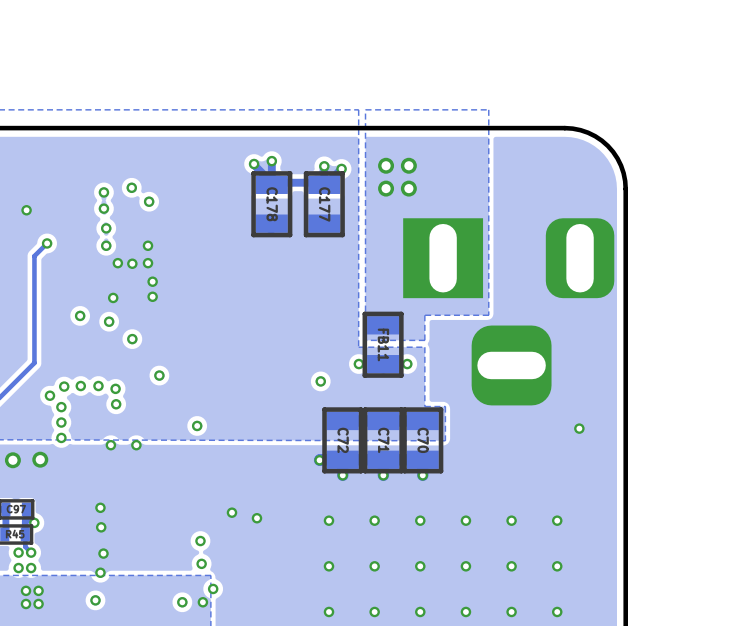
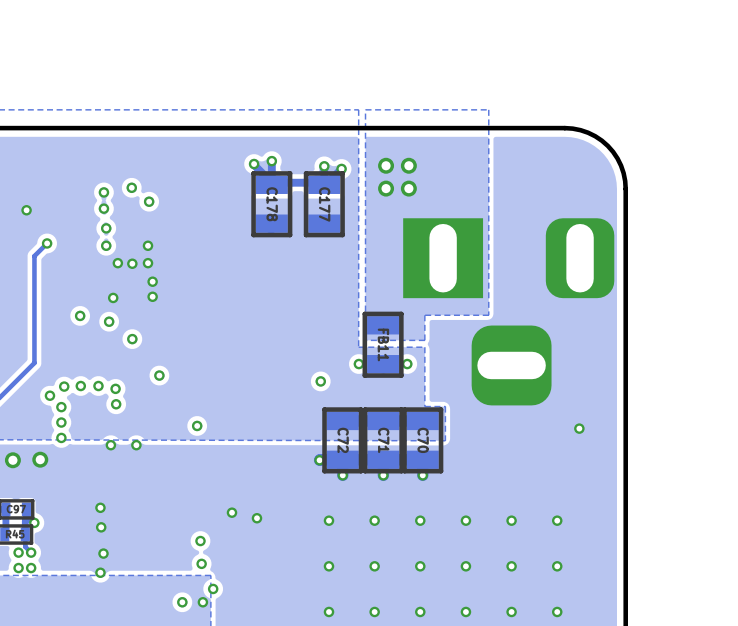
via: (26, 590) -> none
via: (38, 590) -> none
via: (95, 600) -> none
via: (26, 603) -> none
via: (38, 603) -> none

